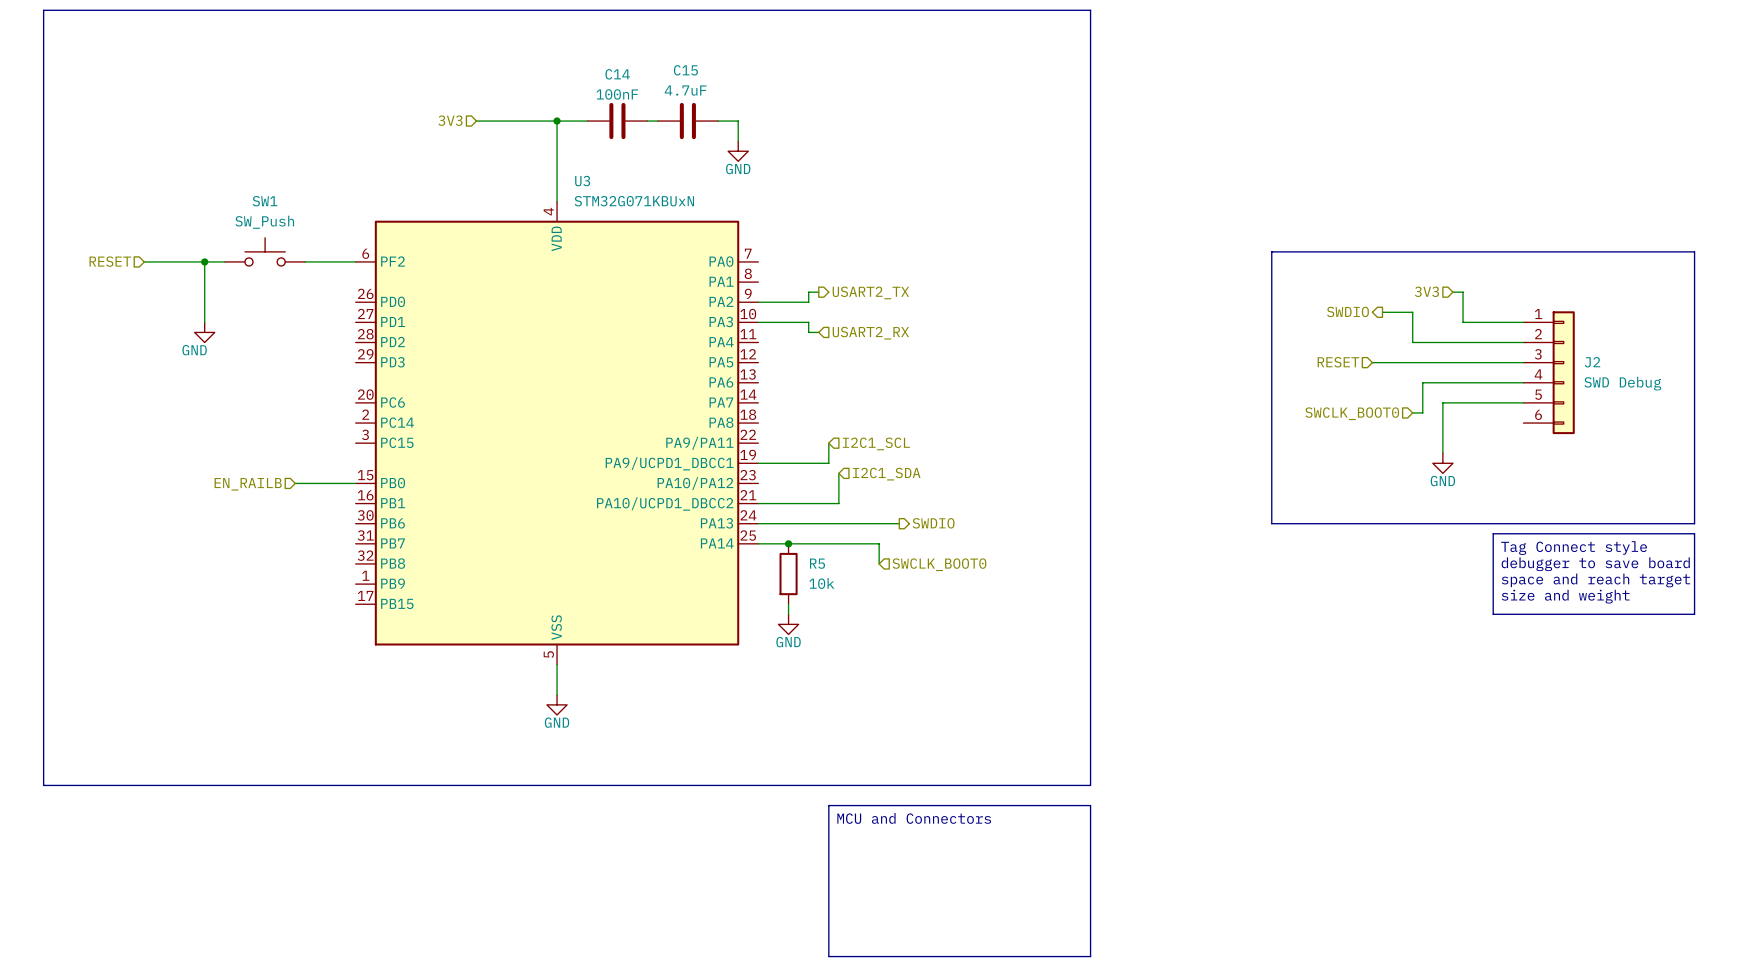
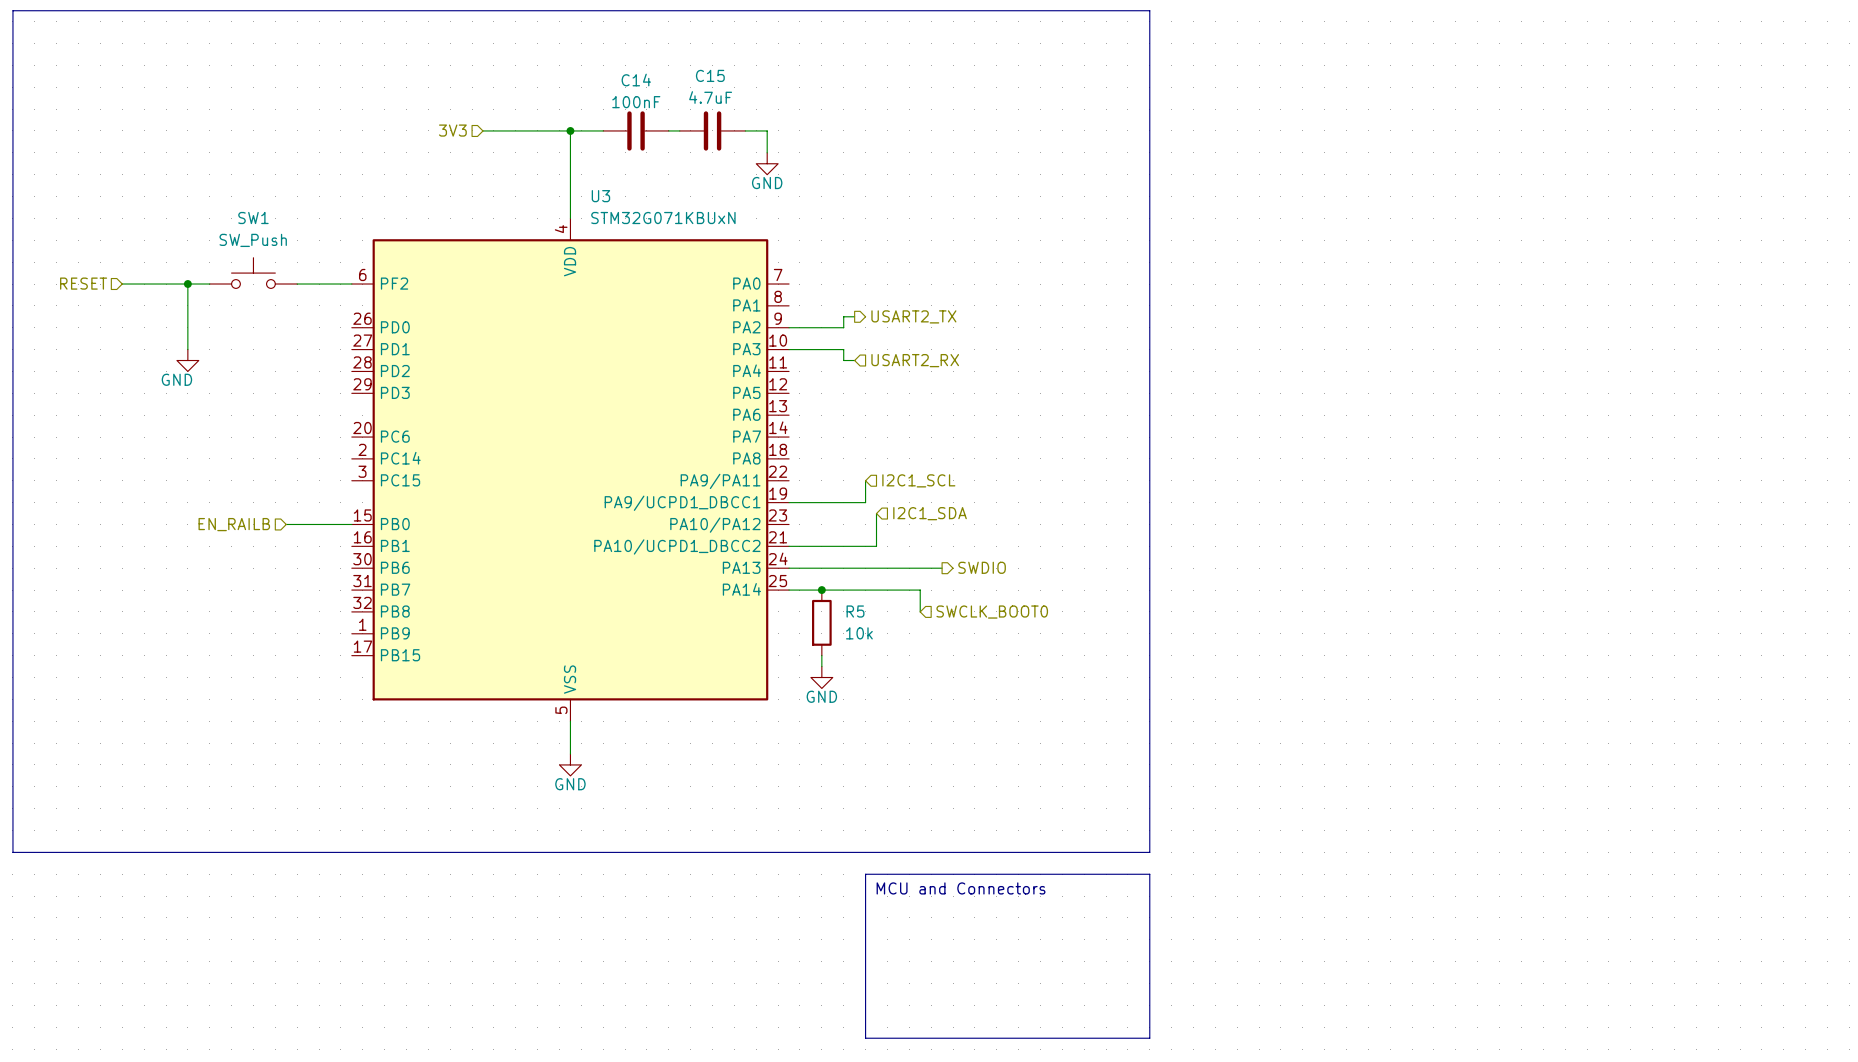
line: (1271, 251) (1694, 251) (1694, 523) (1271, 523) (1271, 251) -> none
hierarchical label: 3V3 (1426, 291) -> none
wire: (1452, 292) (1463, 292) (1463, 322) (1523, 322) -> none
hierarchical label: SWDIO (1347, 311) -> none
wire: (1382, 312) (1412, 312) (1412, 342) (1523, 342) -> none
hierarchical label: RESET (1338, 362) -> none
wire: (1372, 362) (1523, 362) -> none
J2: SWD Debug (1549, 372) -> none
wire: (1523, 382) (1422, 382) (1422, 412) (1412, 412) -> none
wire: (1523, 402) (1442, 402) (1442, 453) -> none
hierarchical label: SWCLK_BOOT0 (1352, 413) -> none
power symbol: GND (1442, 463) -> none
line: (1493, 533) (1694, 533) (1694, 614) (1493, 614) (1493, 533) -> none
text: Tag Connect style (1574, 548) -> none
text: debugger to save board (1595, 564) -> none
text: space and reach target (1595, 580) -> none
text: size and weight (1565, 596) -> none

